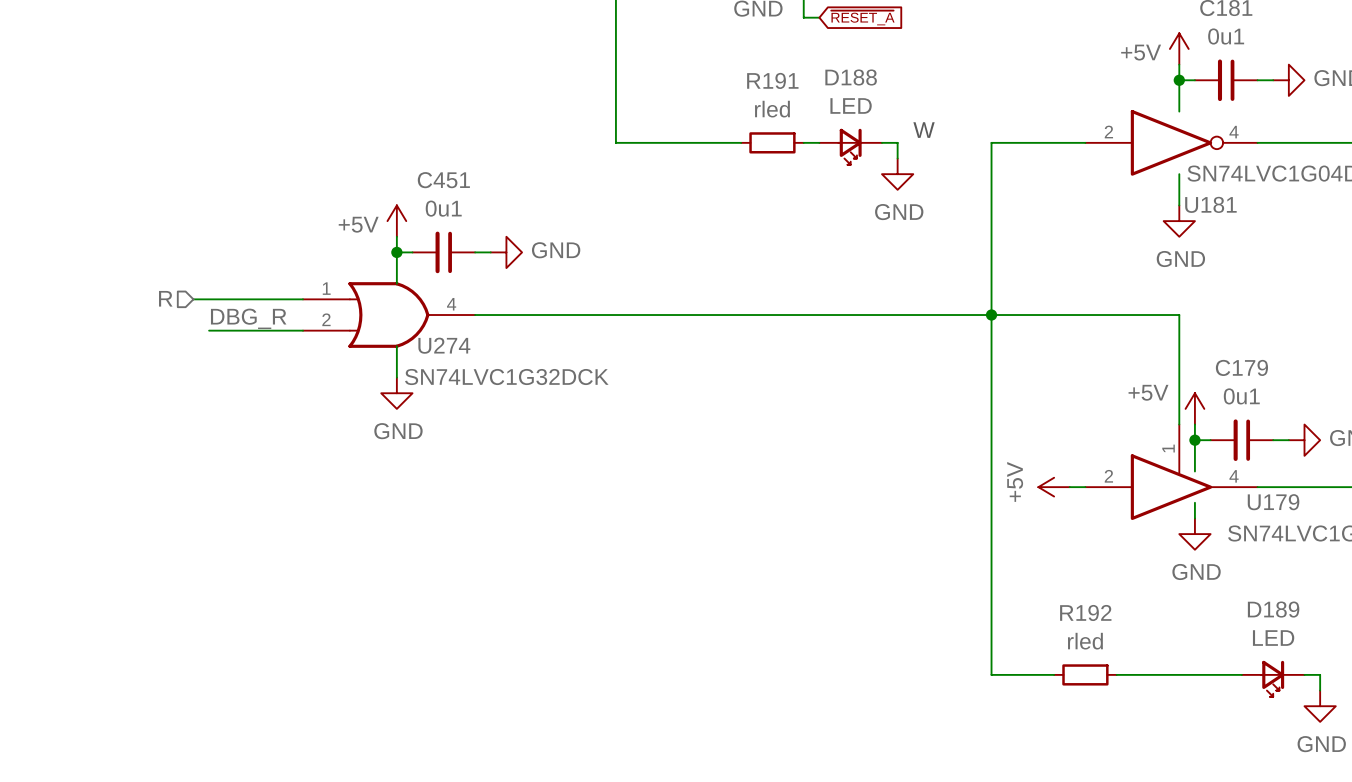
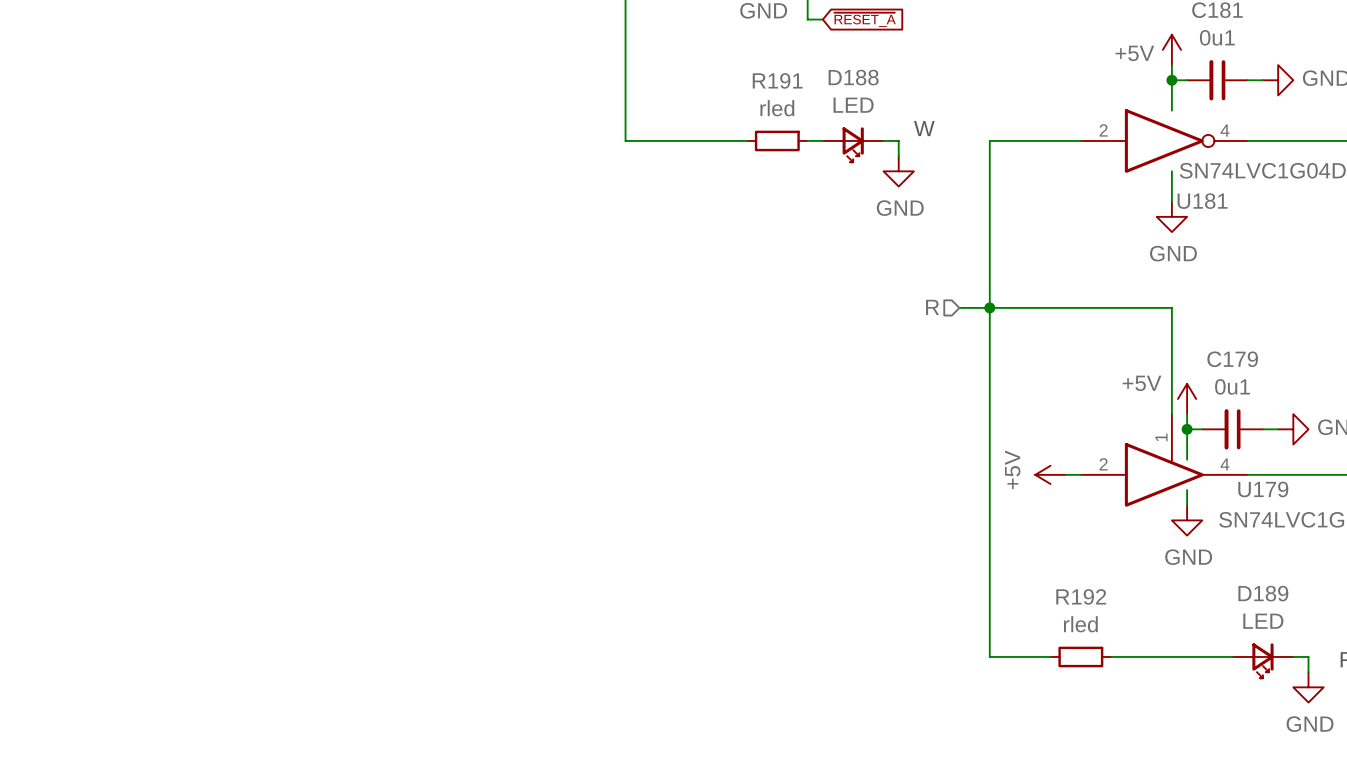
power symbol: +5V (396, 221) -> none
wire: (396, 236) (396, 283) -> none
wire: (396, 252) (412, 252) -> none
junction: (396, 252) -> none
C451: 0u1 (443, 252) -> none
wire: (475, 252) (490, 252) -> none
power symbol: GND (506, 252) -> none
hierarchical label: R (165, 298) -> none
wire: (193, 299) (302, 299) -> none
hierarchical label: none -> R (932, 307)
U274: SN74LVC1G32DCK (389, 315) -> none
wire: (475, 315) (960, 315) -> none
label: DBG_R (248, 318) -> none
wire: (209, 330) (302, 330) -> none
wire: (396, 346) (396, 377) -> none
power symbol: GND (396, 393) -> none

